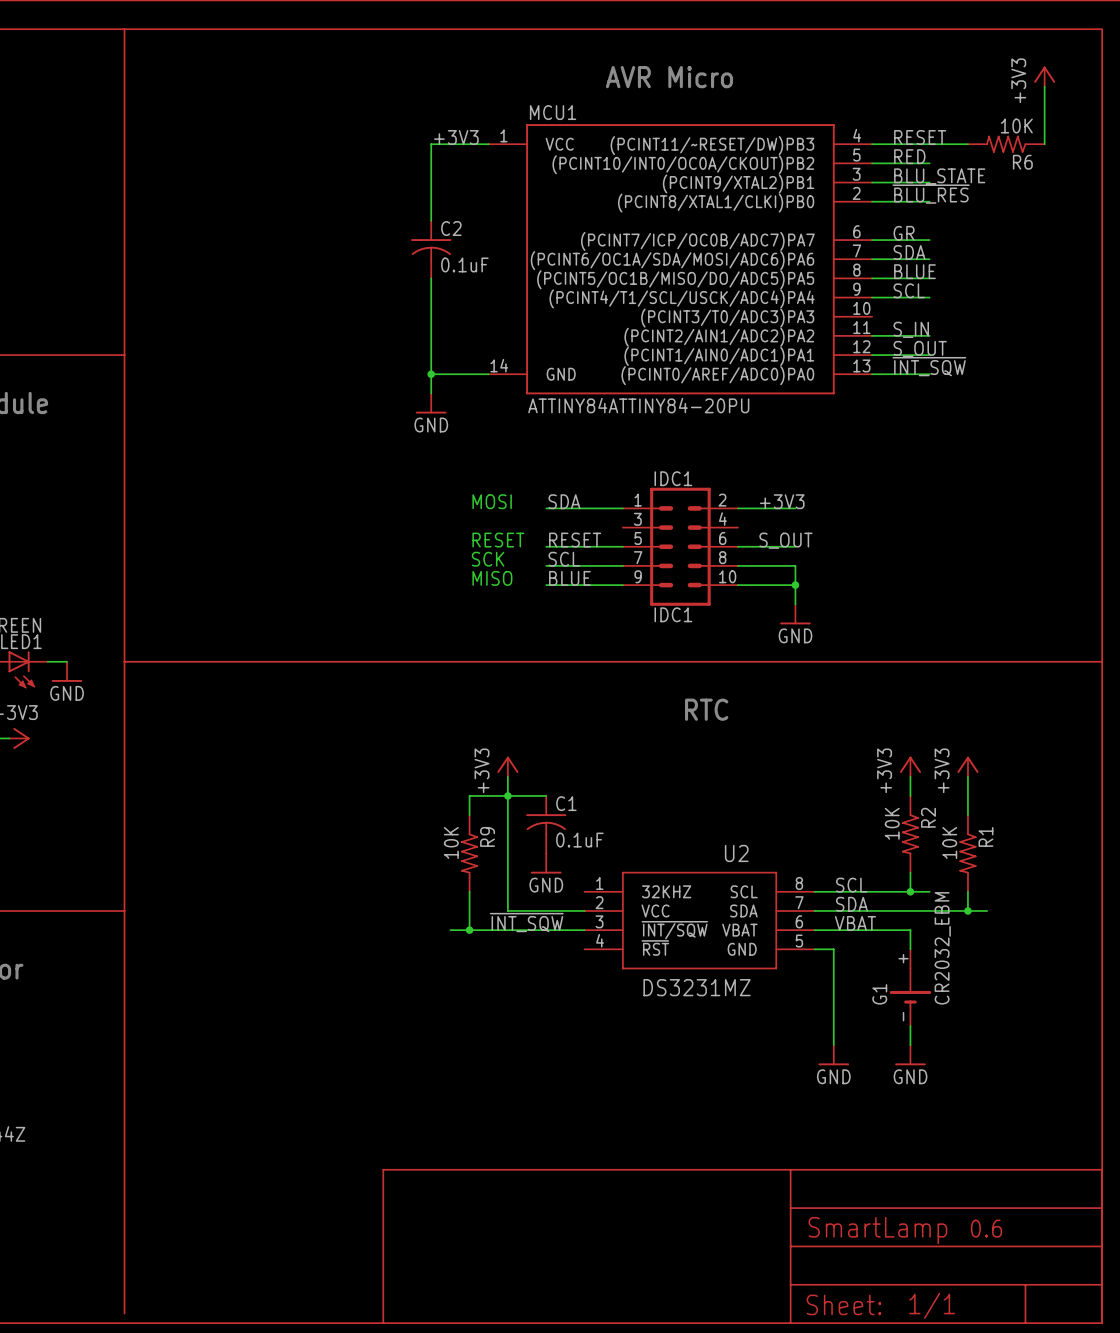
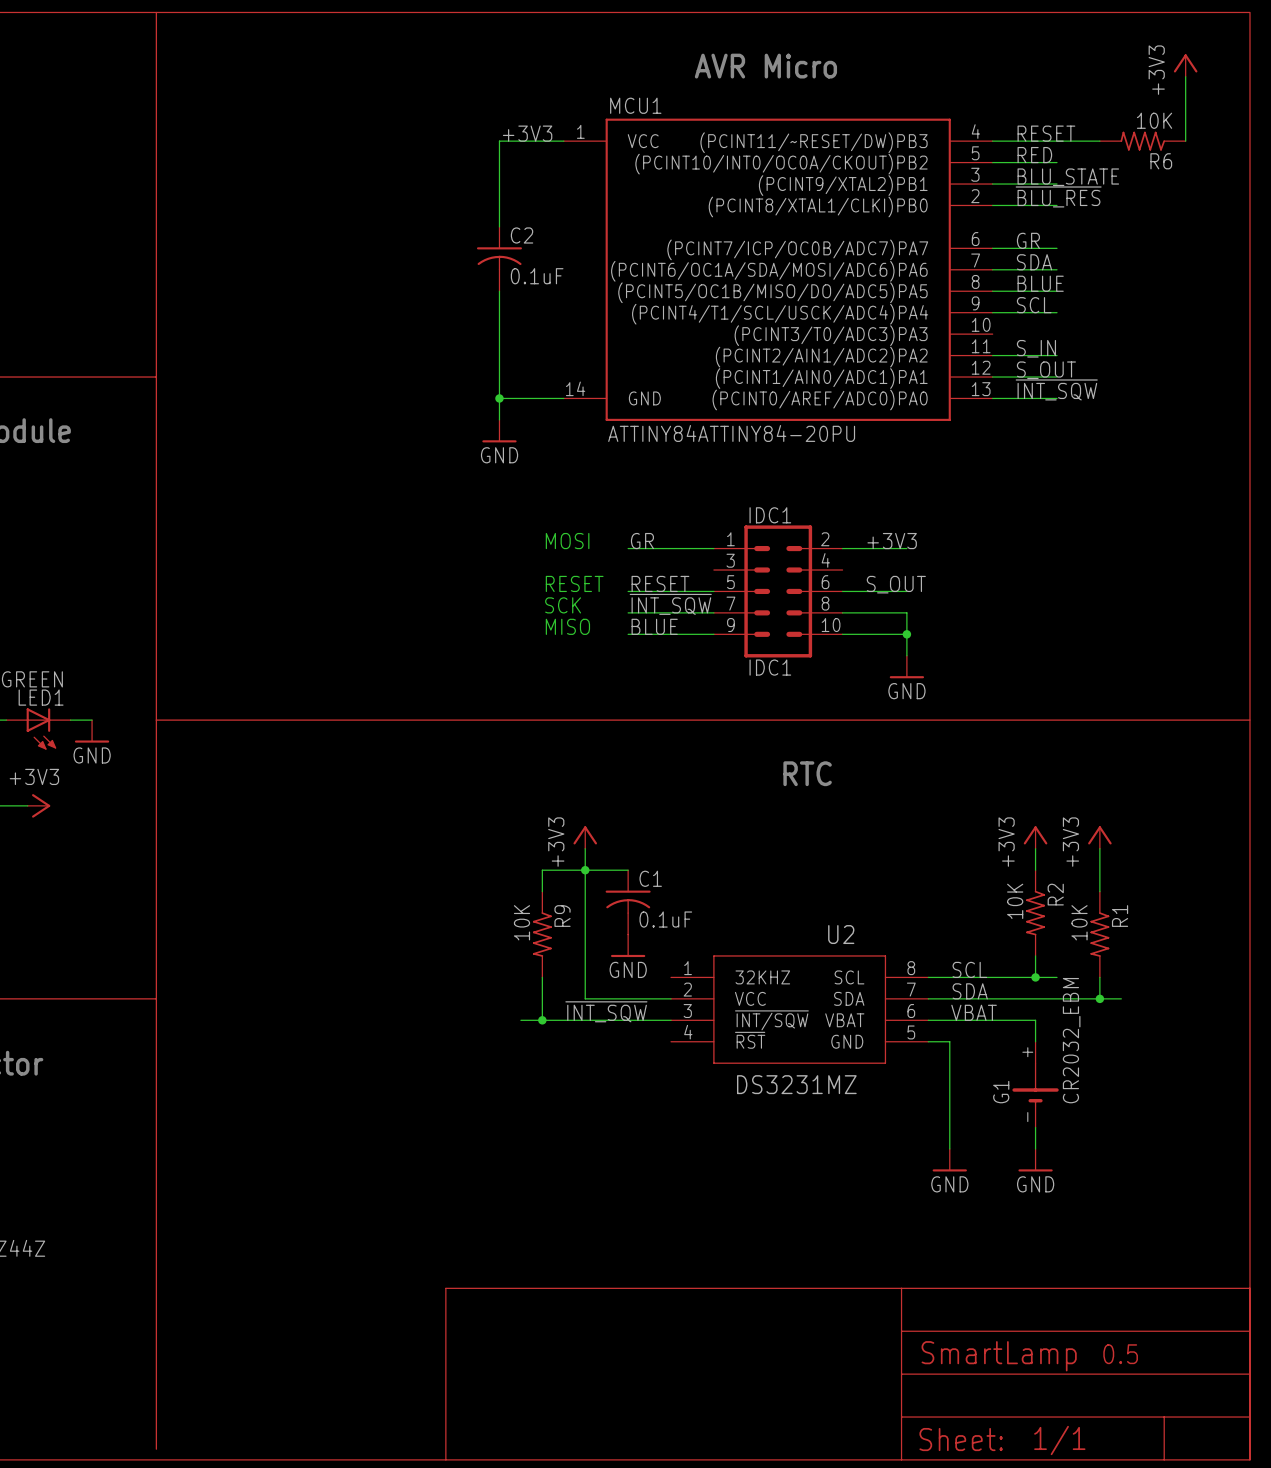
label: SDA (564, 501) -> GR (642, 541)
label: SCL (564, 559) -> ~{INT_SQW} (670, 604)
text: 0.6 (986, 1228) -> 0.5 (1120, 1354)

